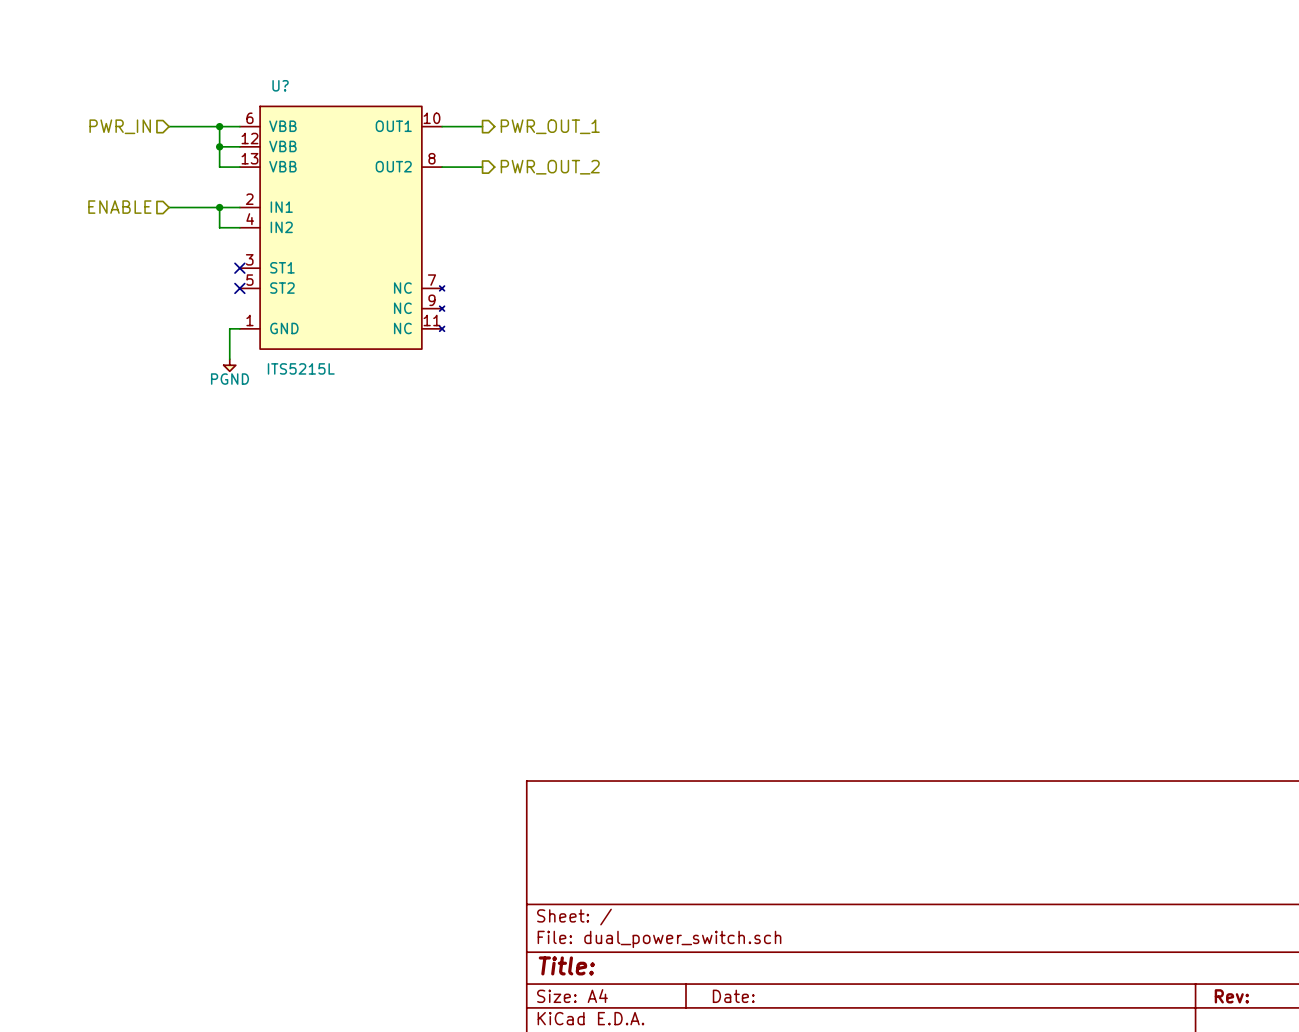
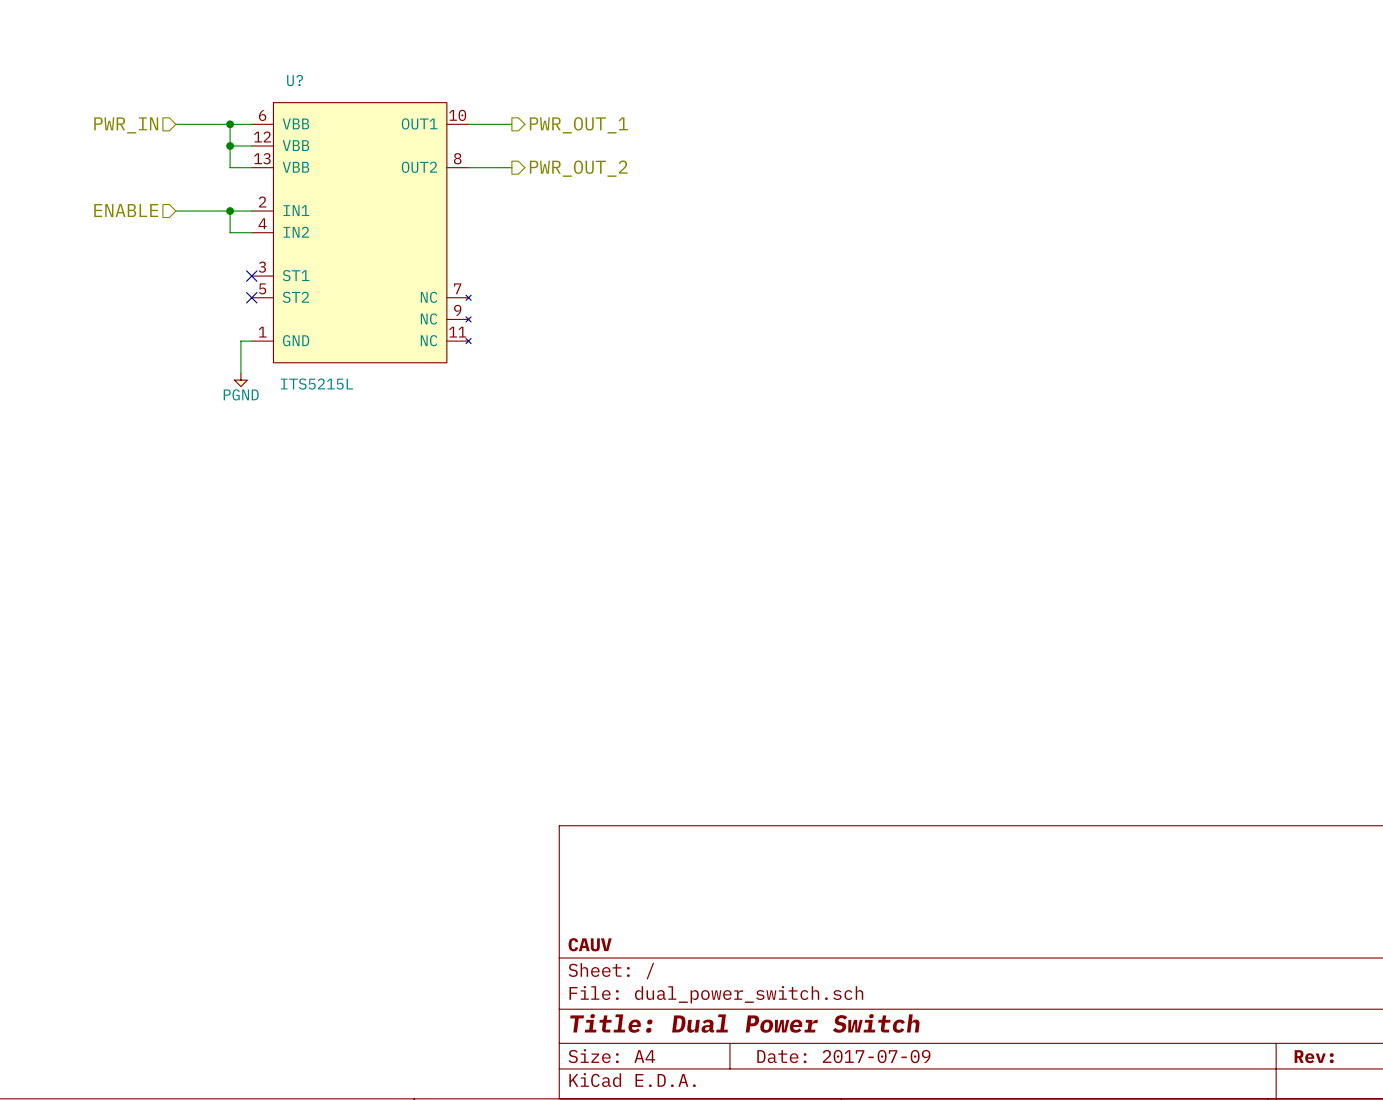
title block: none -> CAUV (590, 944)
title block: Title: (566, 965) -> Title: Dual Power Switch (744, 1023)
title block: Date: (733, 996) -> Date: 2017-07-09 (843, 1056)

